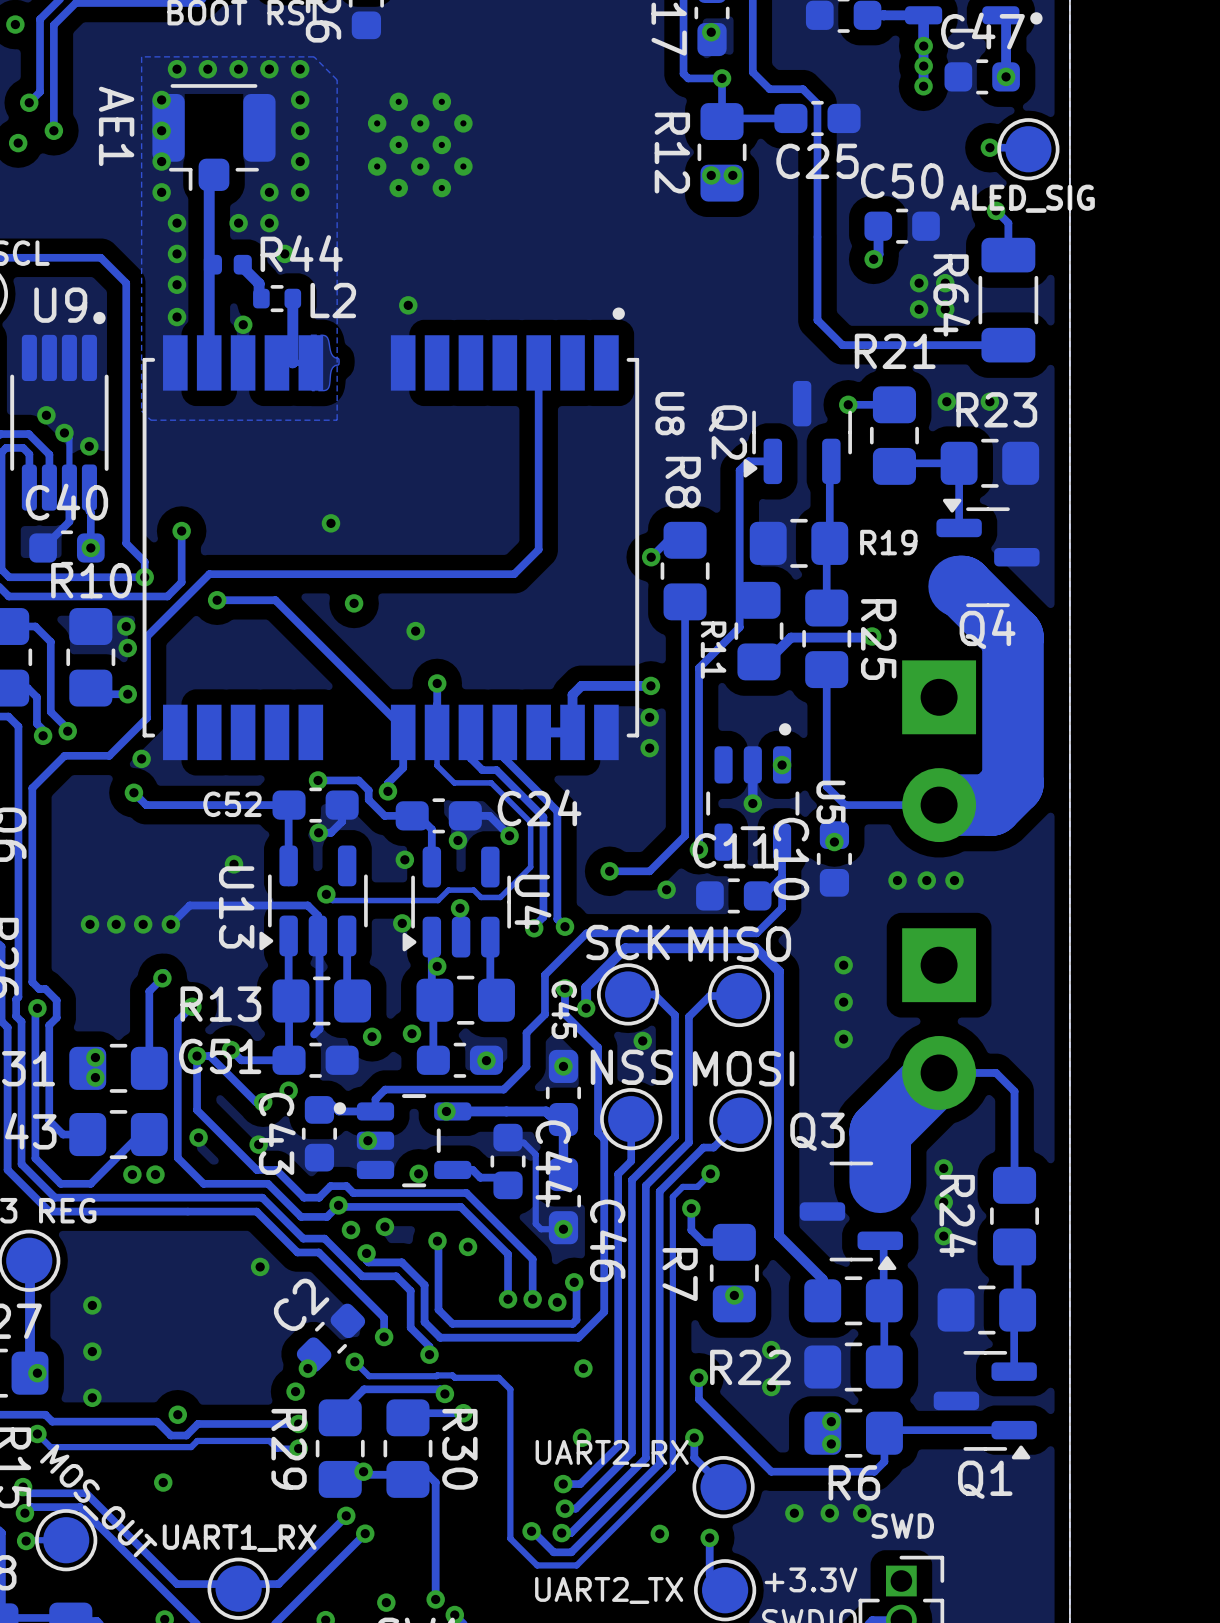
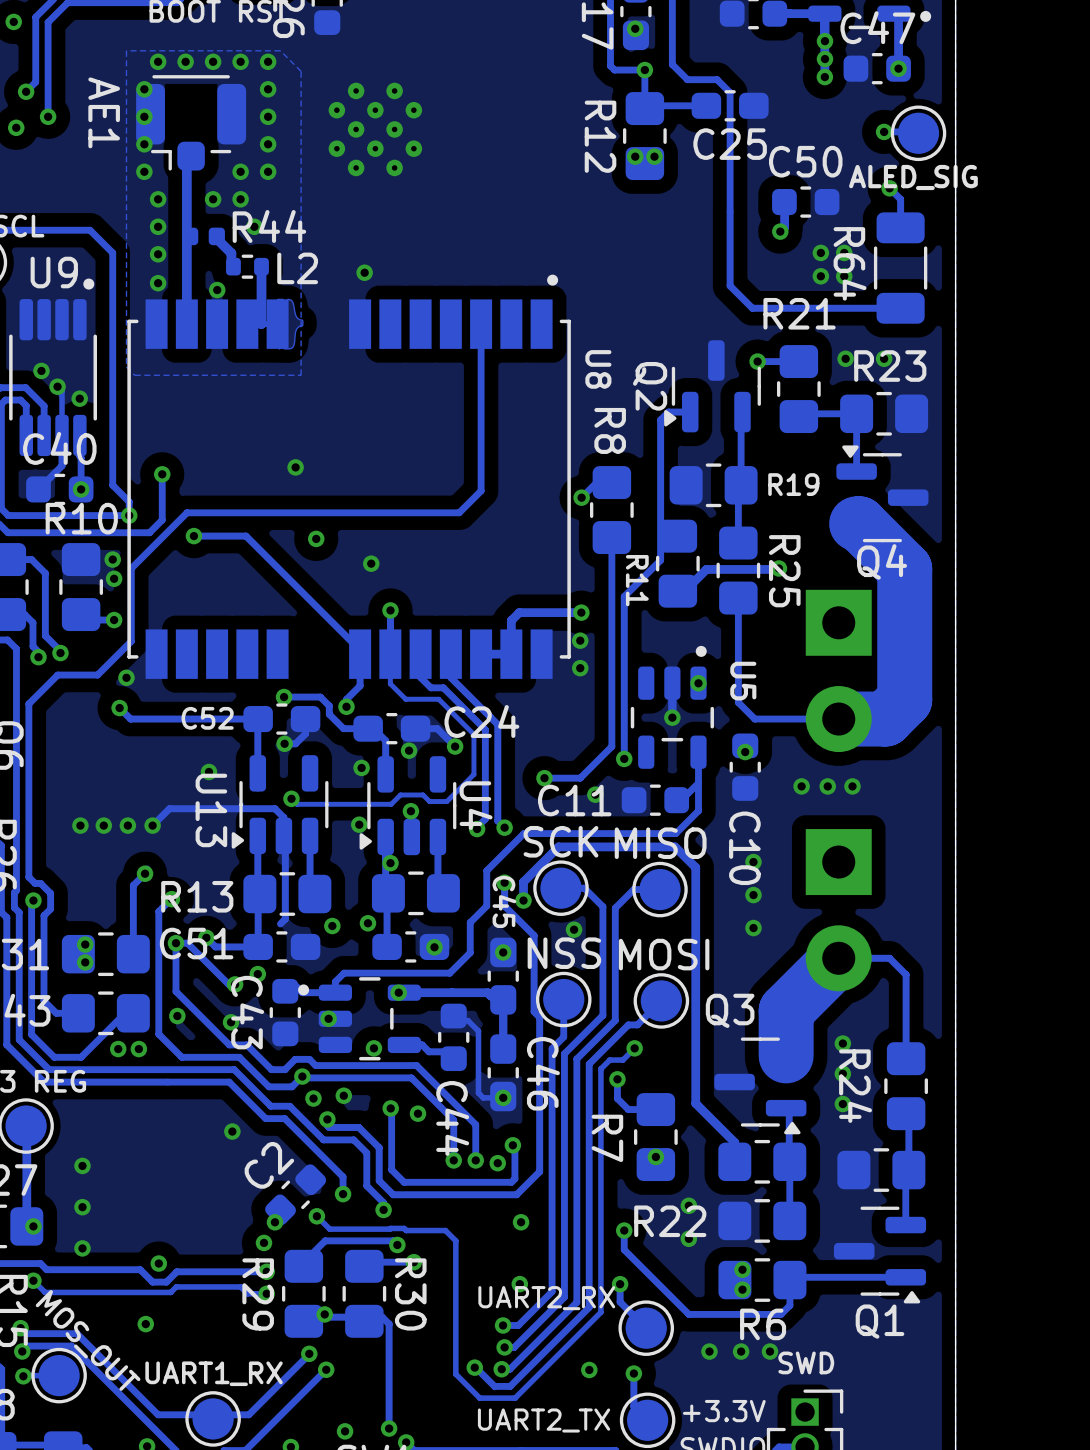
U5 name position: U5 (830, 802) -> U5 (743, 681)
C11 name position: C11 (733, 850) -> C11 (574, 800)
C10 name position: C10 (791, 858) -> C10 (744, 848)
C44 name position: C44 (553, 1162) -> C44 (452, 1118)
C46 name position: C46 (608, 1240) -> C46 (543, 1073)

